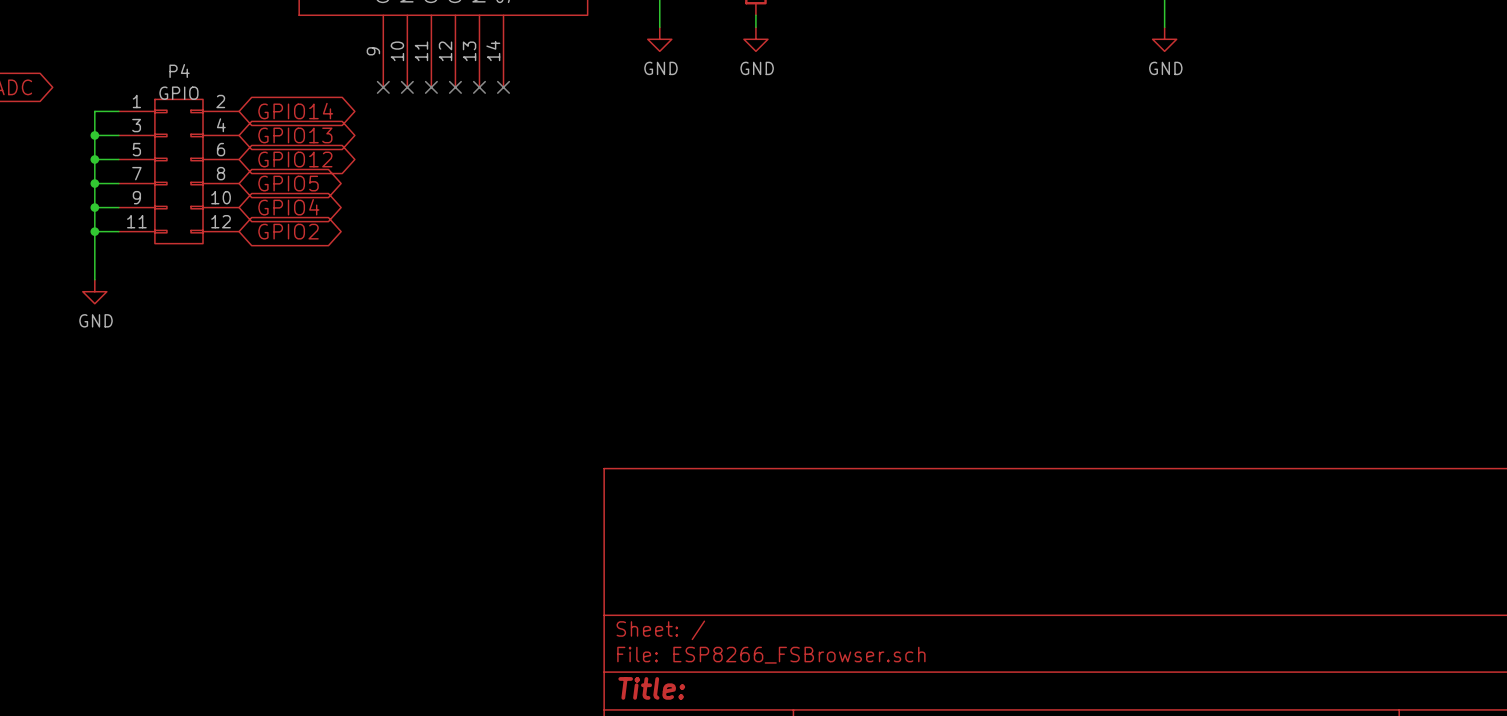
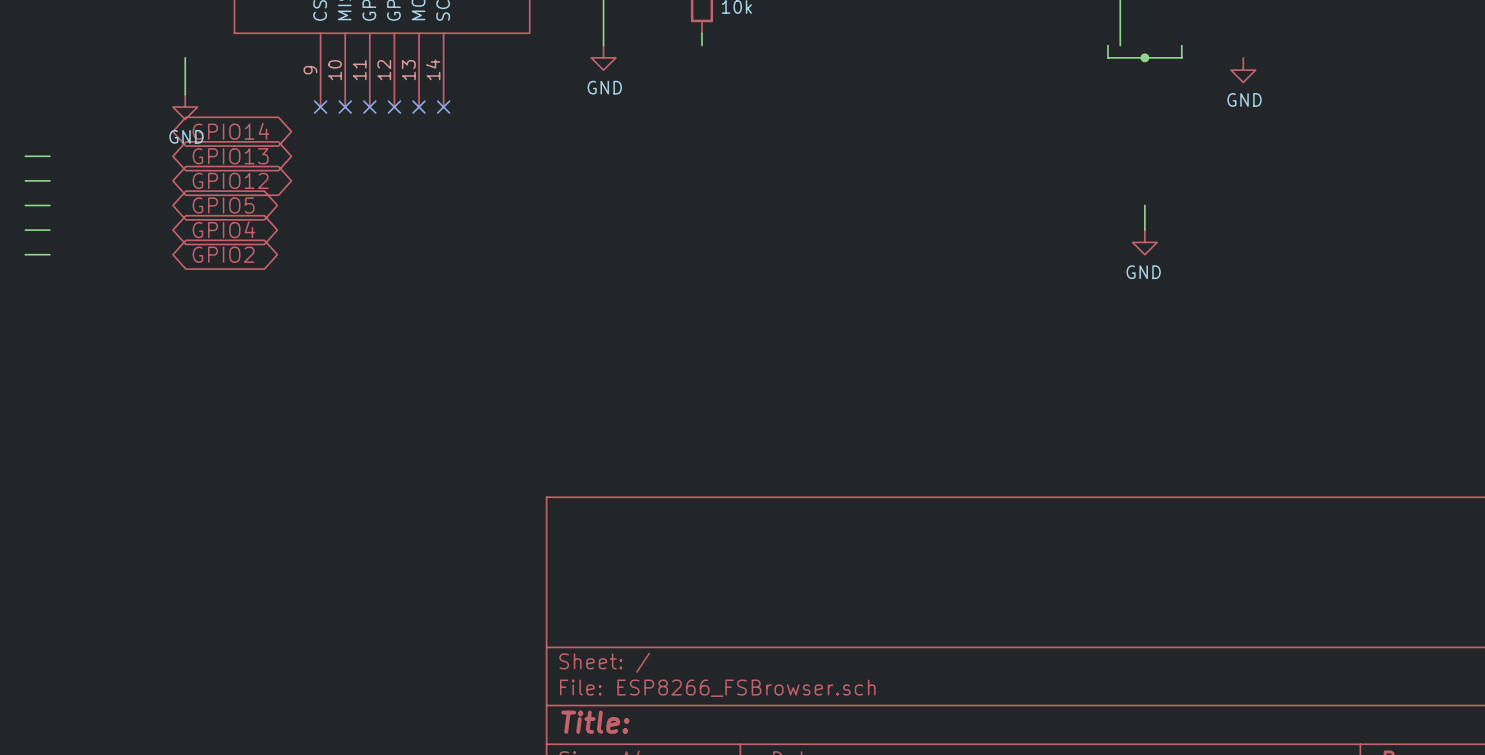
wire: none -> (1107, 45) (1107, 57) (1181, 57) (1181, 45)
wire: none -> (185, 57) (185, 94)
power symbol: GND (755, 39) -> none
power symbol: GND (1164, 39) -> none
junction: none -> (1144, 57)
power symbol: none -> GND (1243, 70)
power symbol: none -> GND (185, 107)
wire: (118, 111) (94, 111) (94, 279) -> none
junction: (94, 135) -> none
junction: (94, 159) -> none
P4: GPIO (178, 171) -> none
junction: (94, 183) -> none
wire: none -> (1144, 205) (1144, 230)
junction: (94, 207) -> none
power symbol: none -> GND (1144, 242)
junction: (94, 231) -> none
power symbol: GND (94, 291) -> none

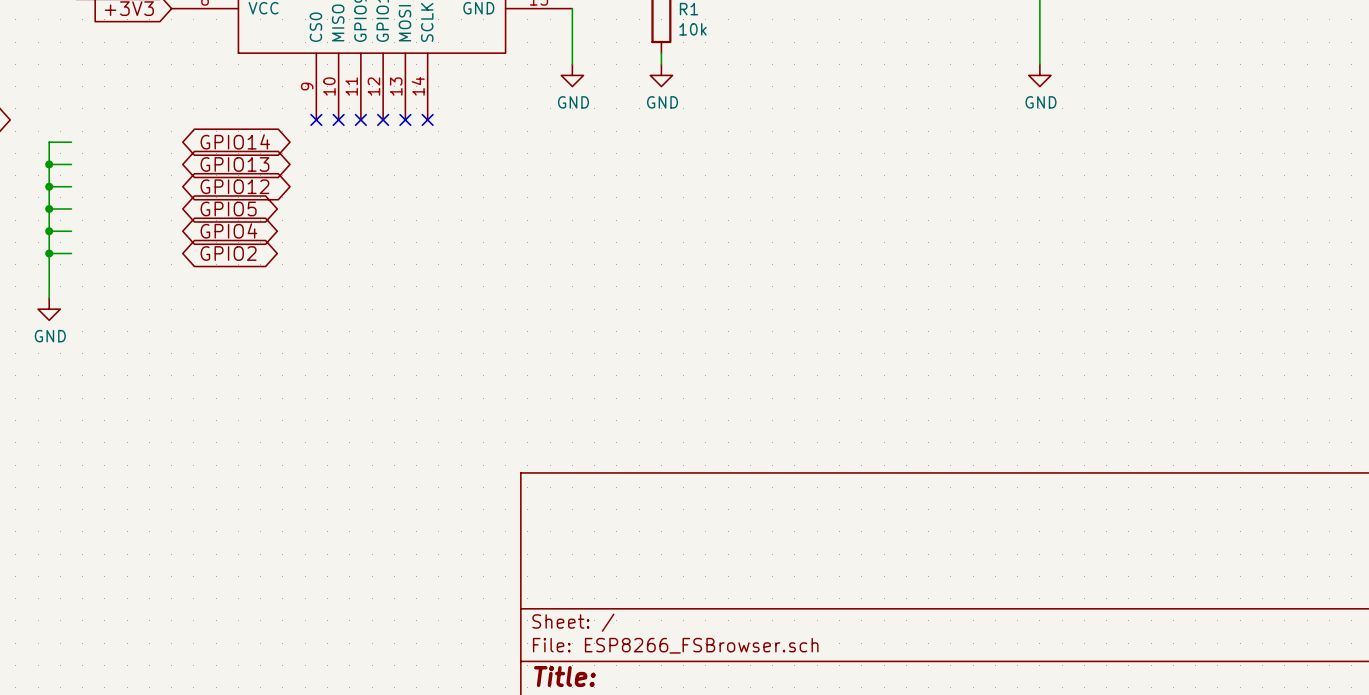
wire: (1107, 45) (1107, 57) (1181, 57) (1181, 45) -> none
wire: (185, 57) (185, 94) -> none
power symbol: none -> GND (661, 75)
power symbol: none -> GND (1039, 75)
junction: (1144, 57) -> none
power symbol: GND (1243, 70) -> none
power symbol: GND (185, 107) -> none
wire: none -> (71, 142) (49, 142) (49, 298)
junction: none -> (49, 164)
junction: none -> (49, 186)
junction: none -> (49, 208)
wire: (1144, 205) (1144, 230) -> none
junction: none -> (49, 231)
power symbol: GND (1144, 242) -> none
junction: none -> (49, 253)
power symbol: none -> GND (49, 309)

